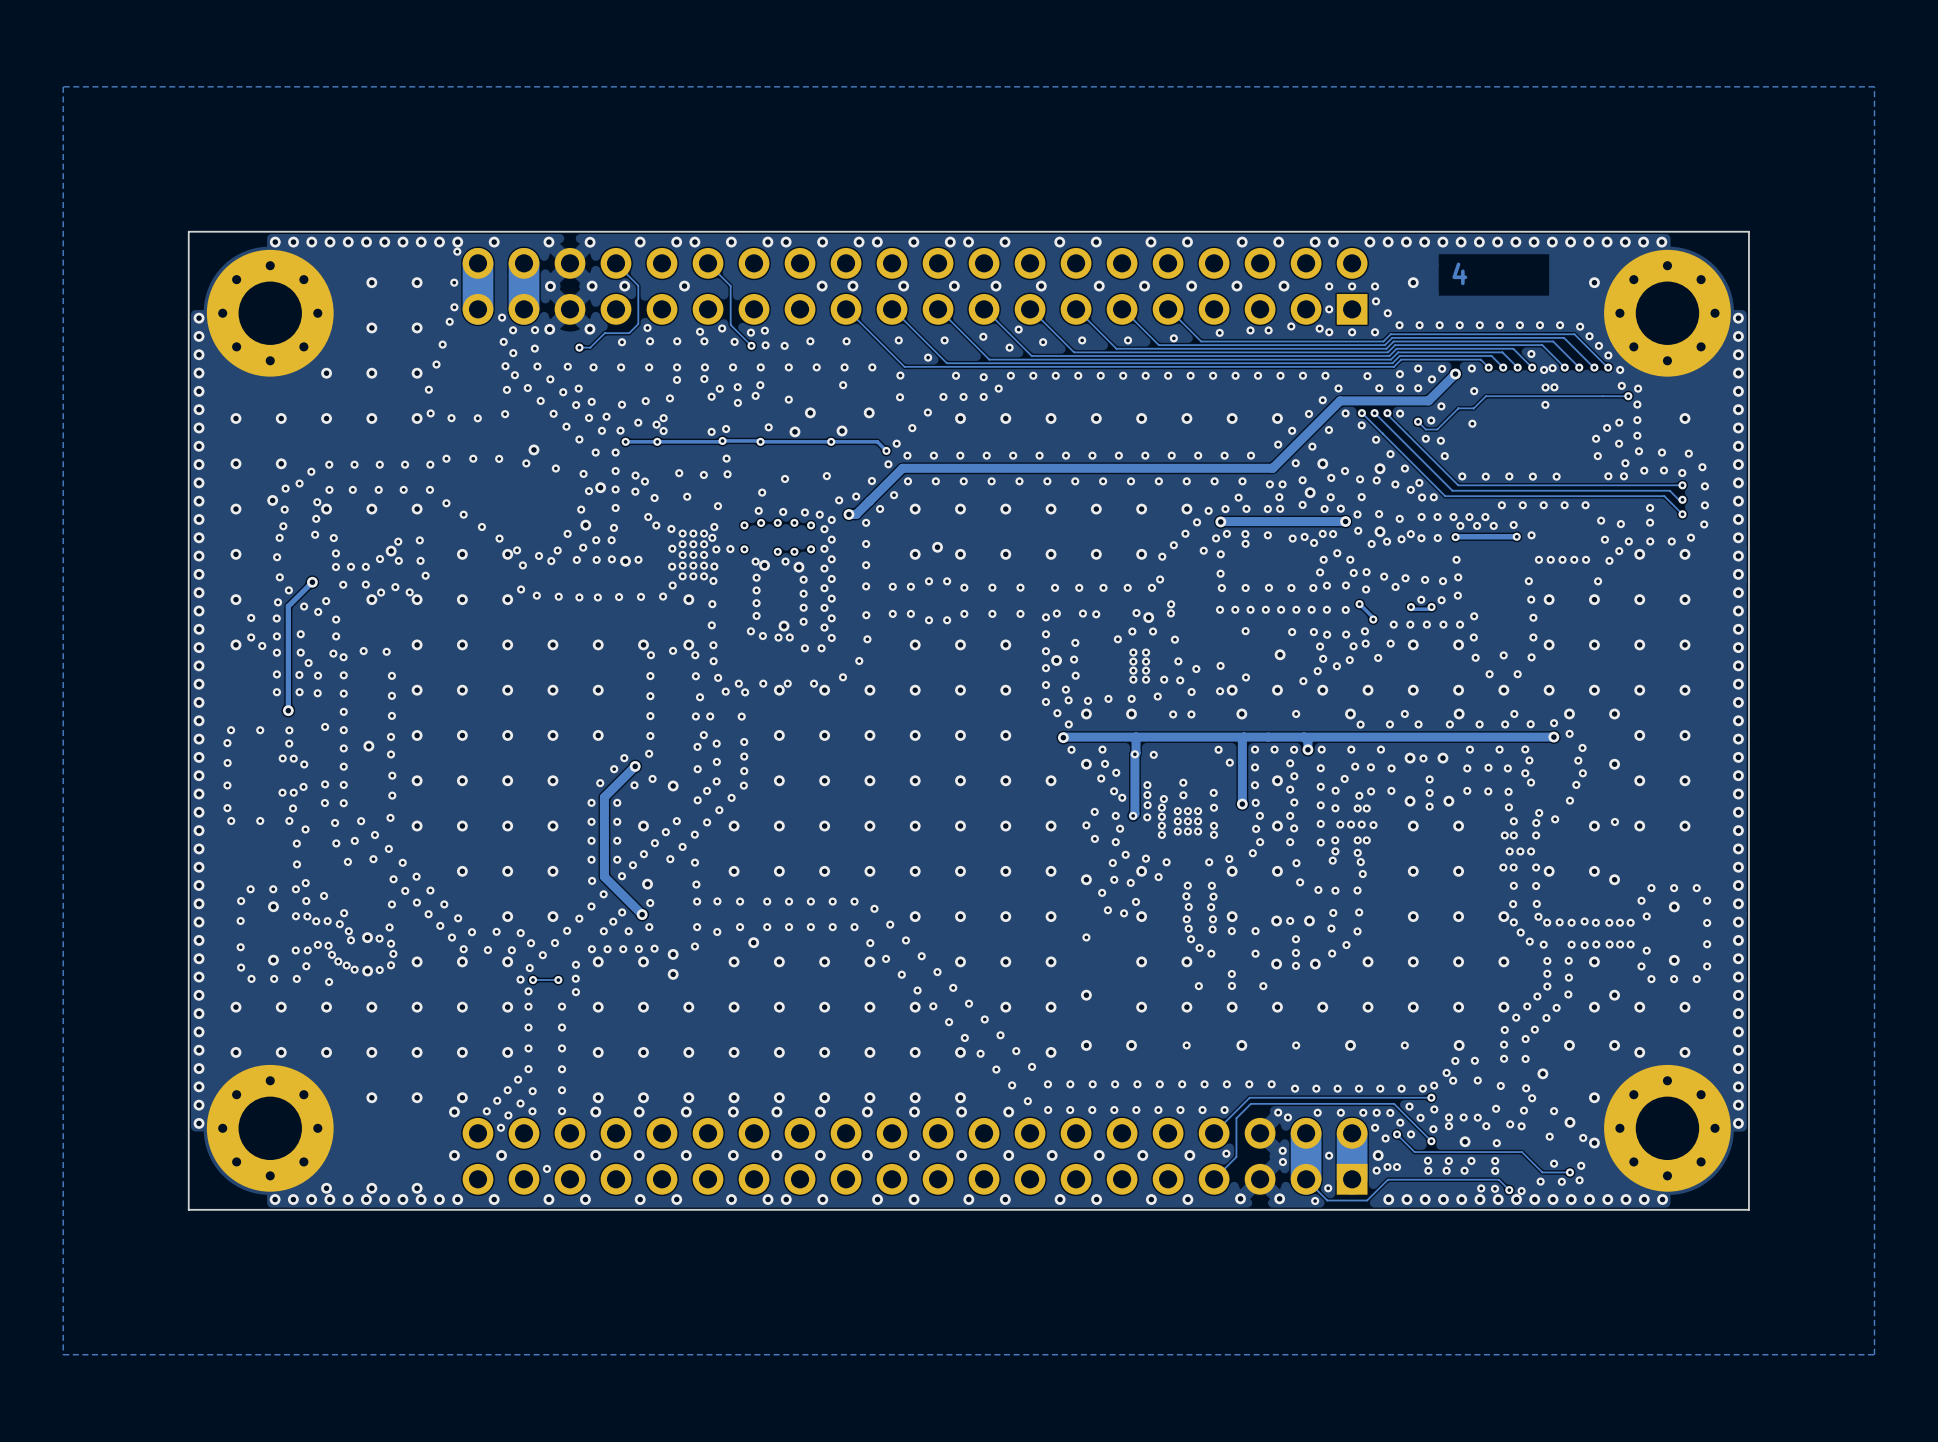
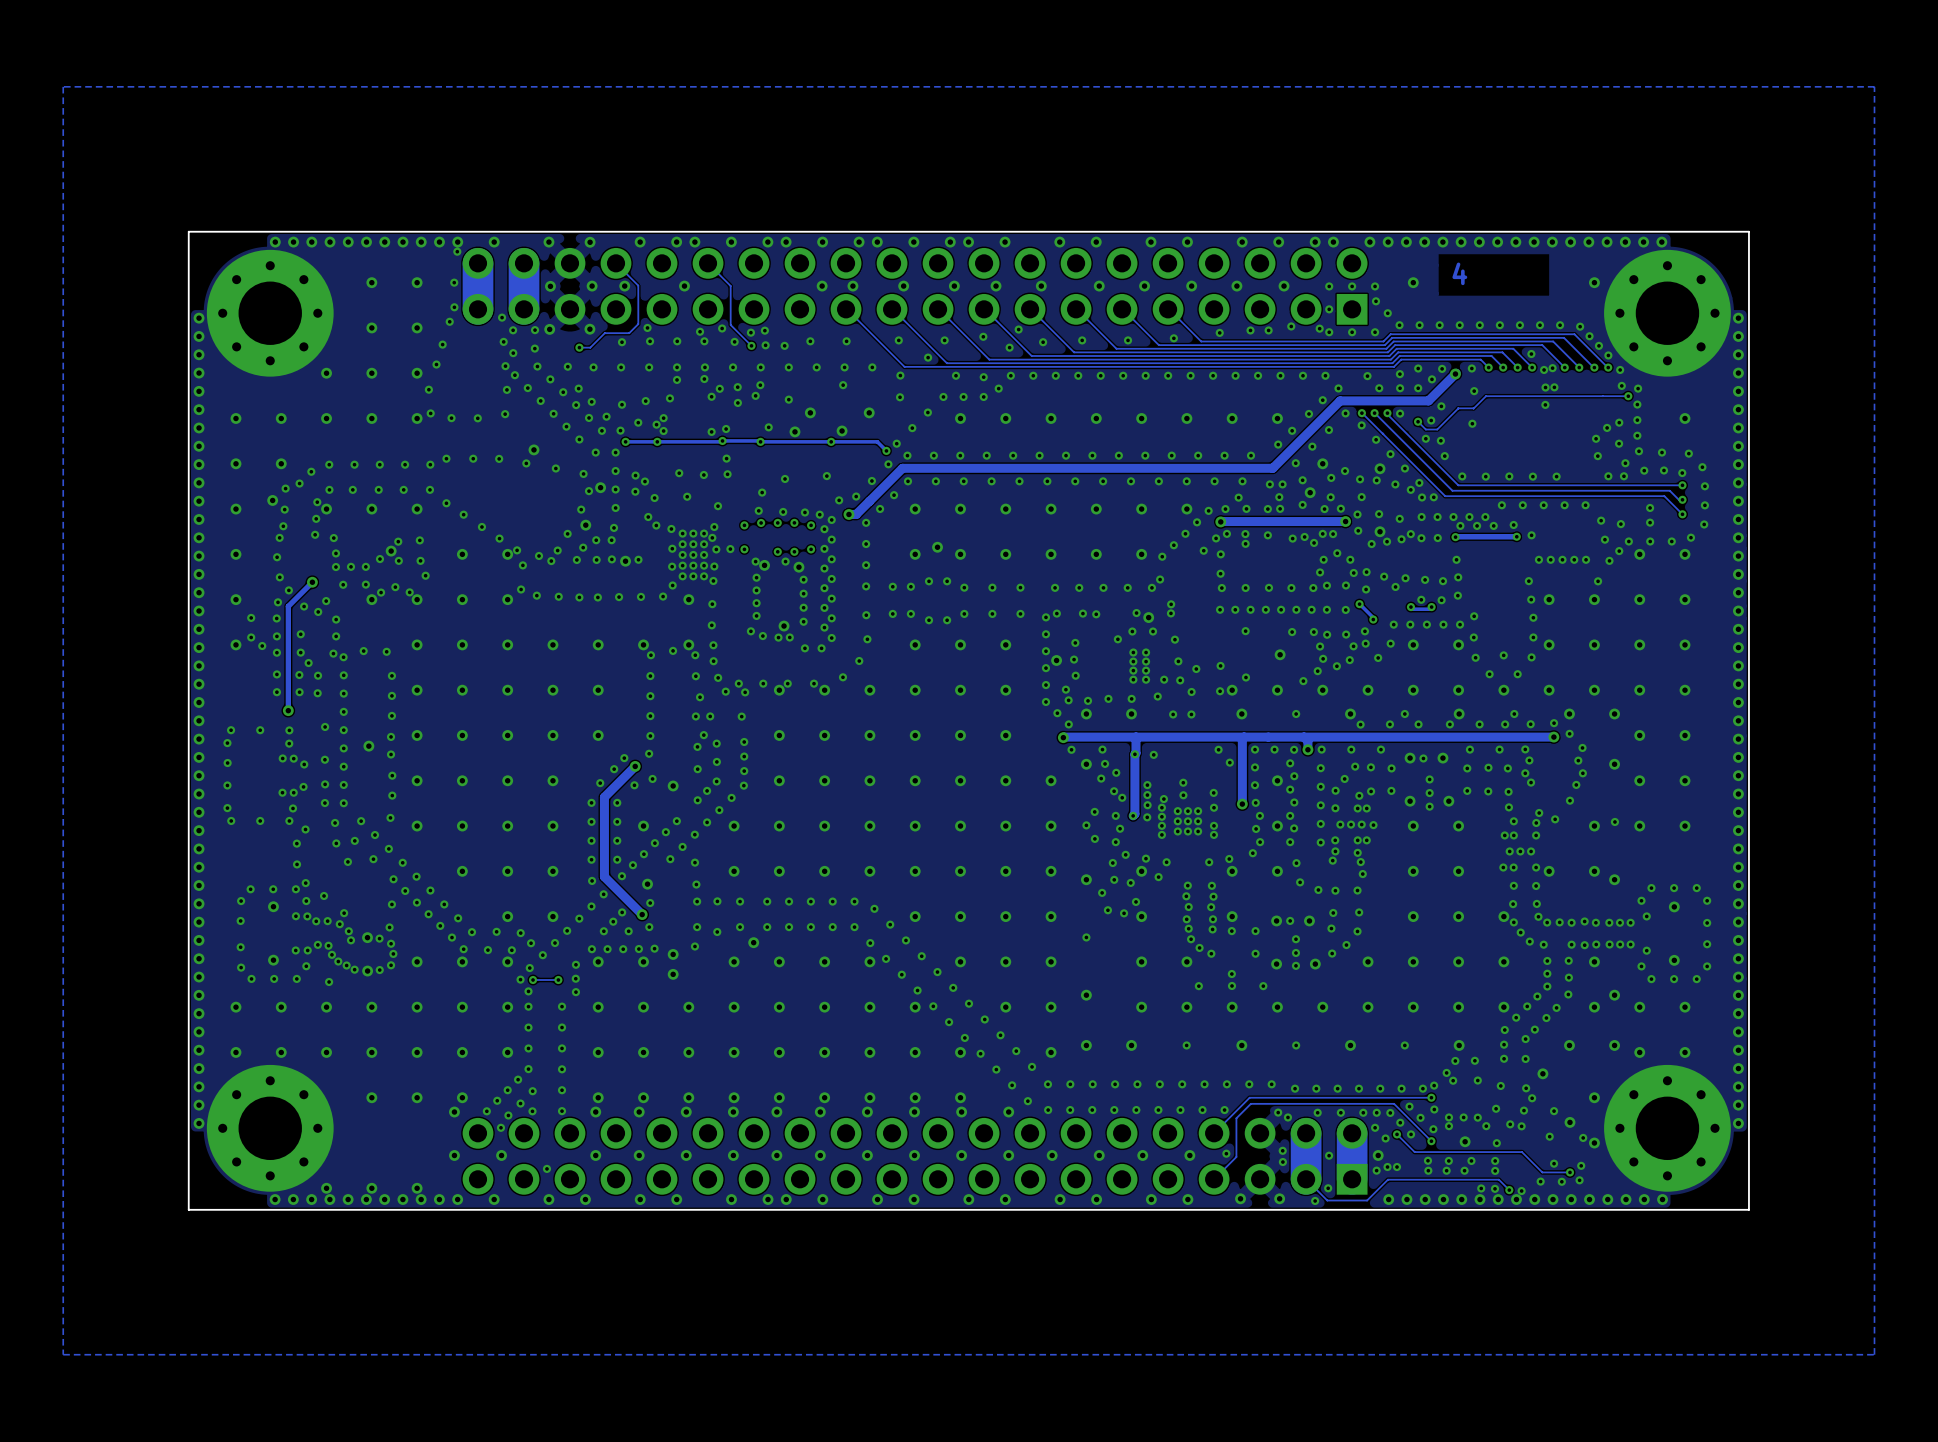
via: none -> (324, 759)

